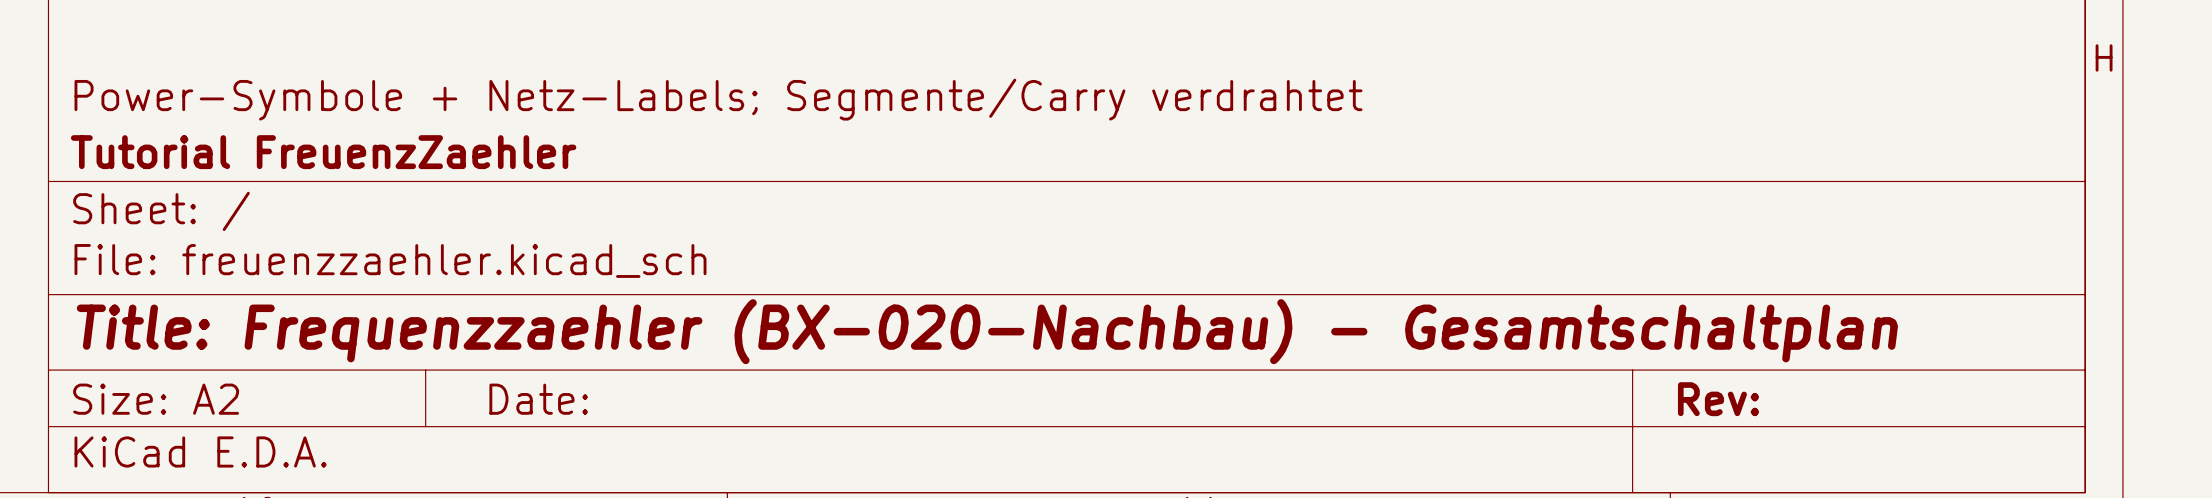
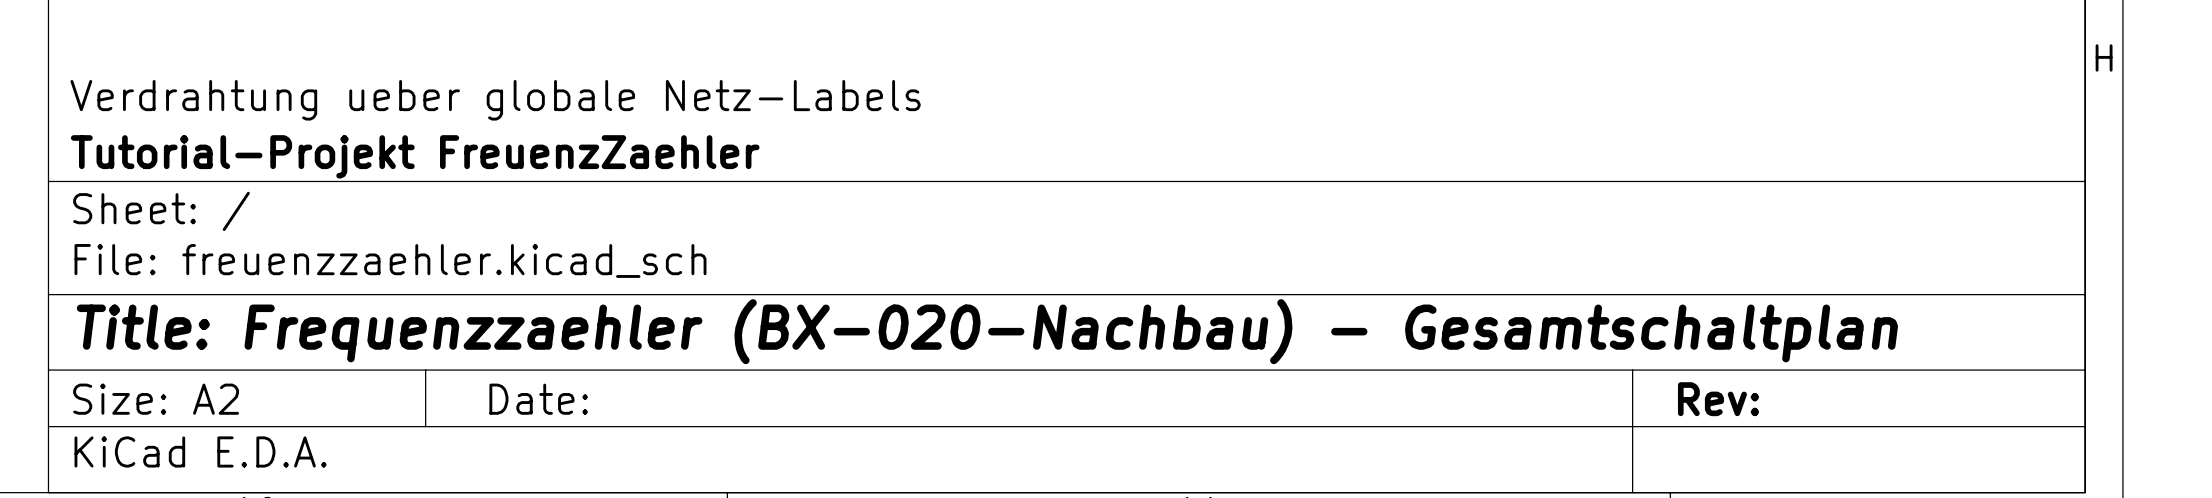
title block: Power-Symbole + Netz-Labels; Segmente/Carry verdrahtet (718, 99) -> Verdrahtung ueber globale Netz-Labels (495, 100)
title block: Tutorial FreuenzZaehler (323, 152) -> Tutorial-Projekt FreuenzZaehler (415, 156)

